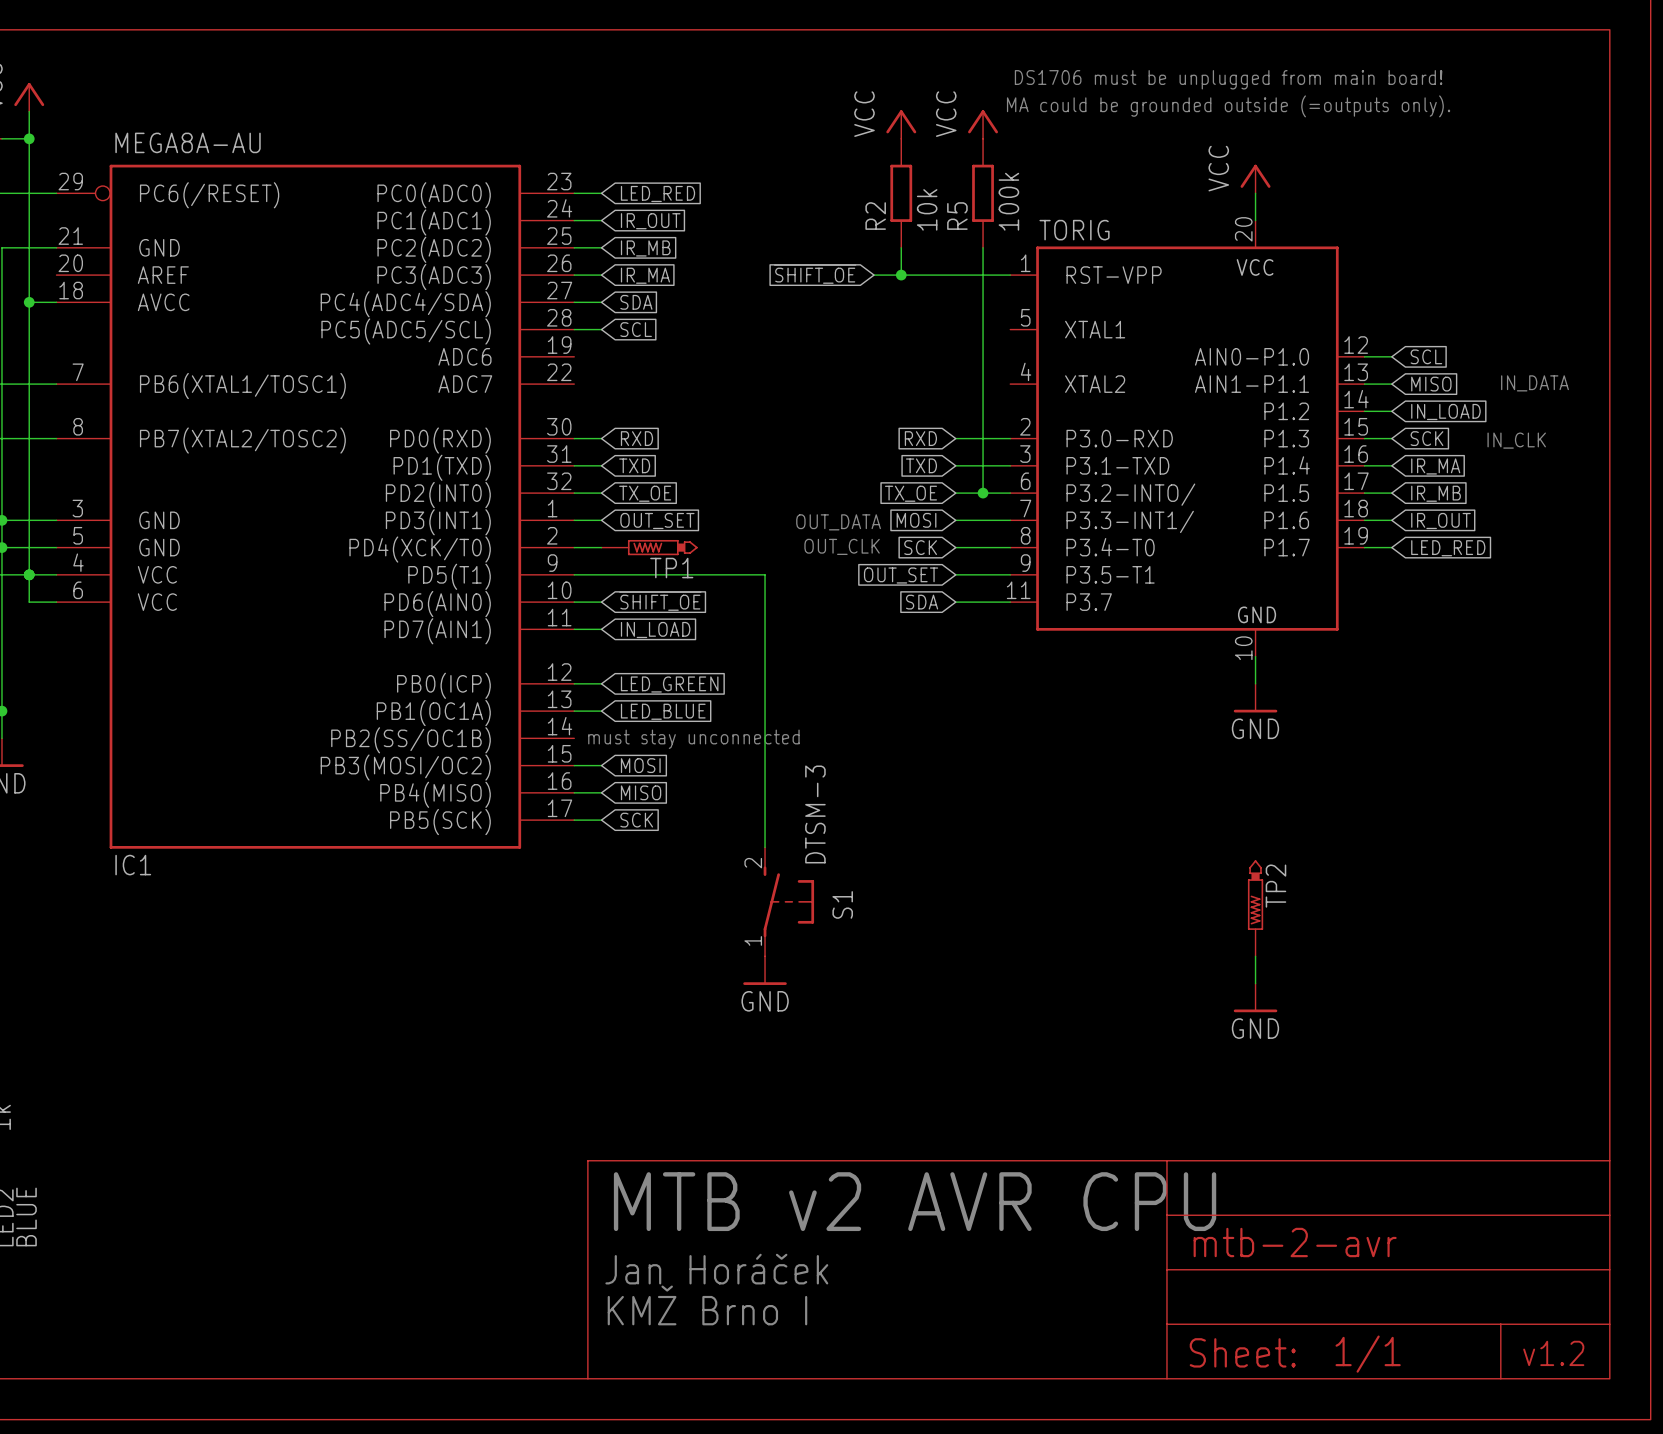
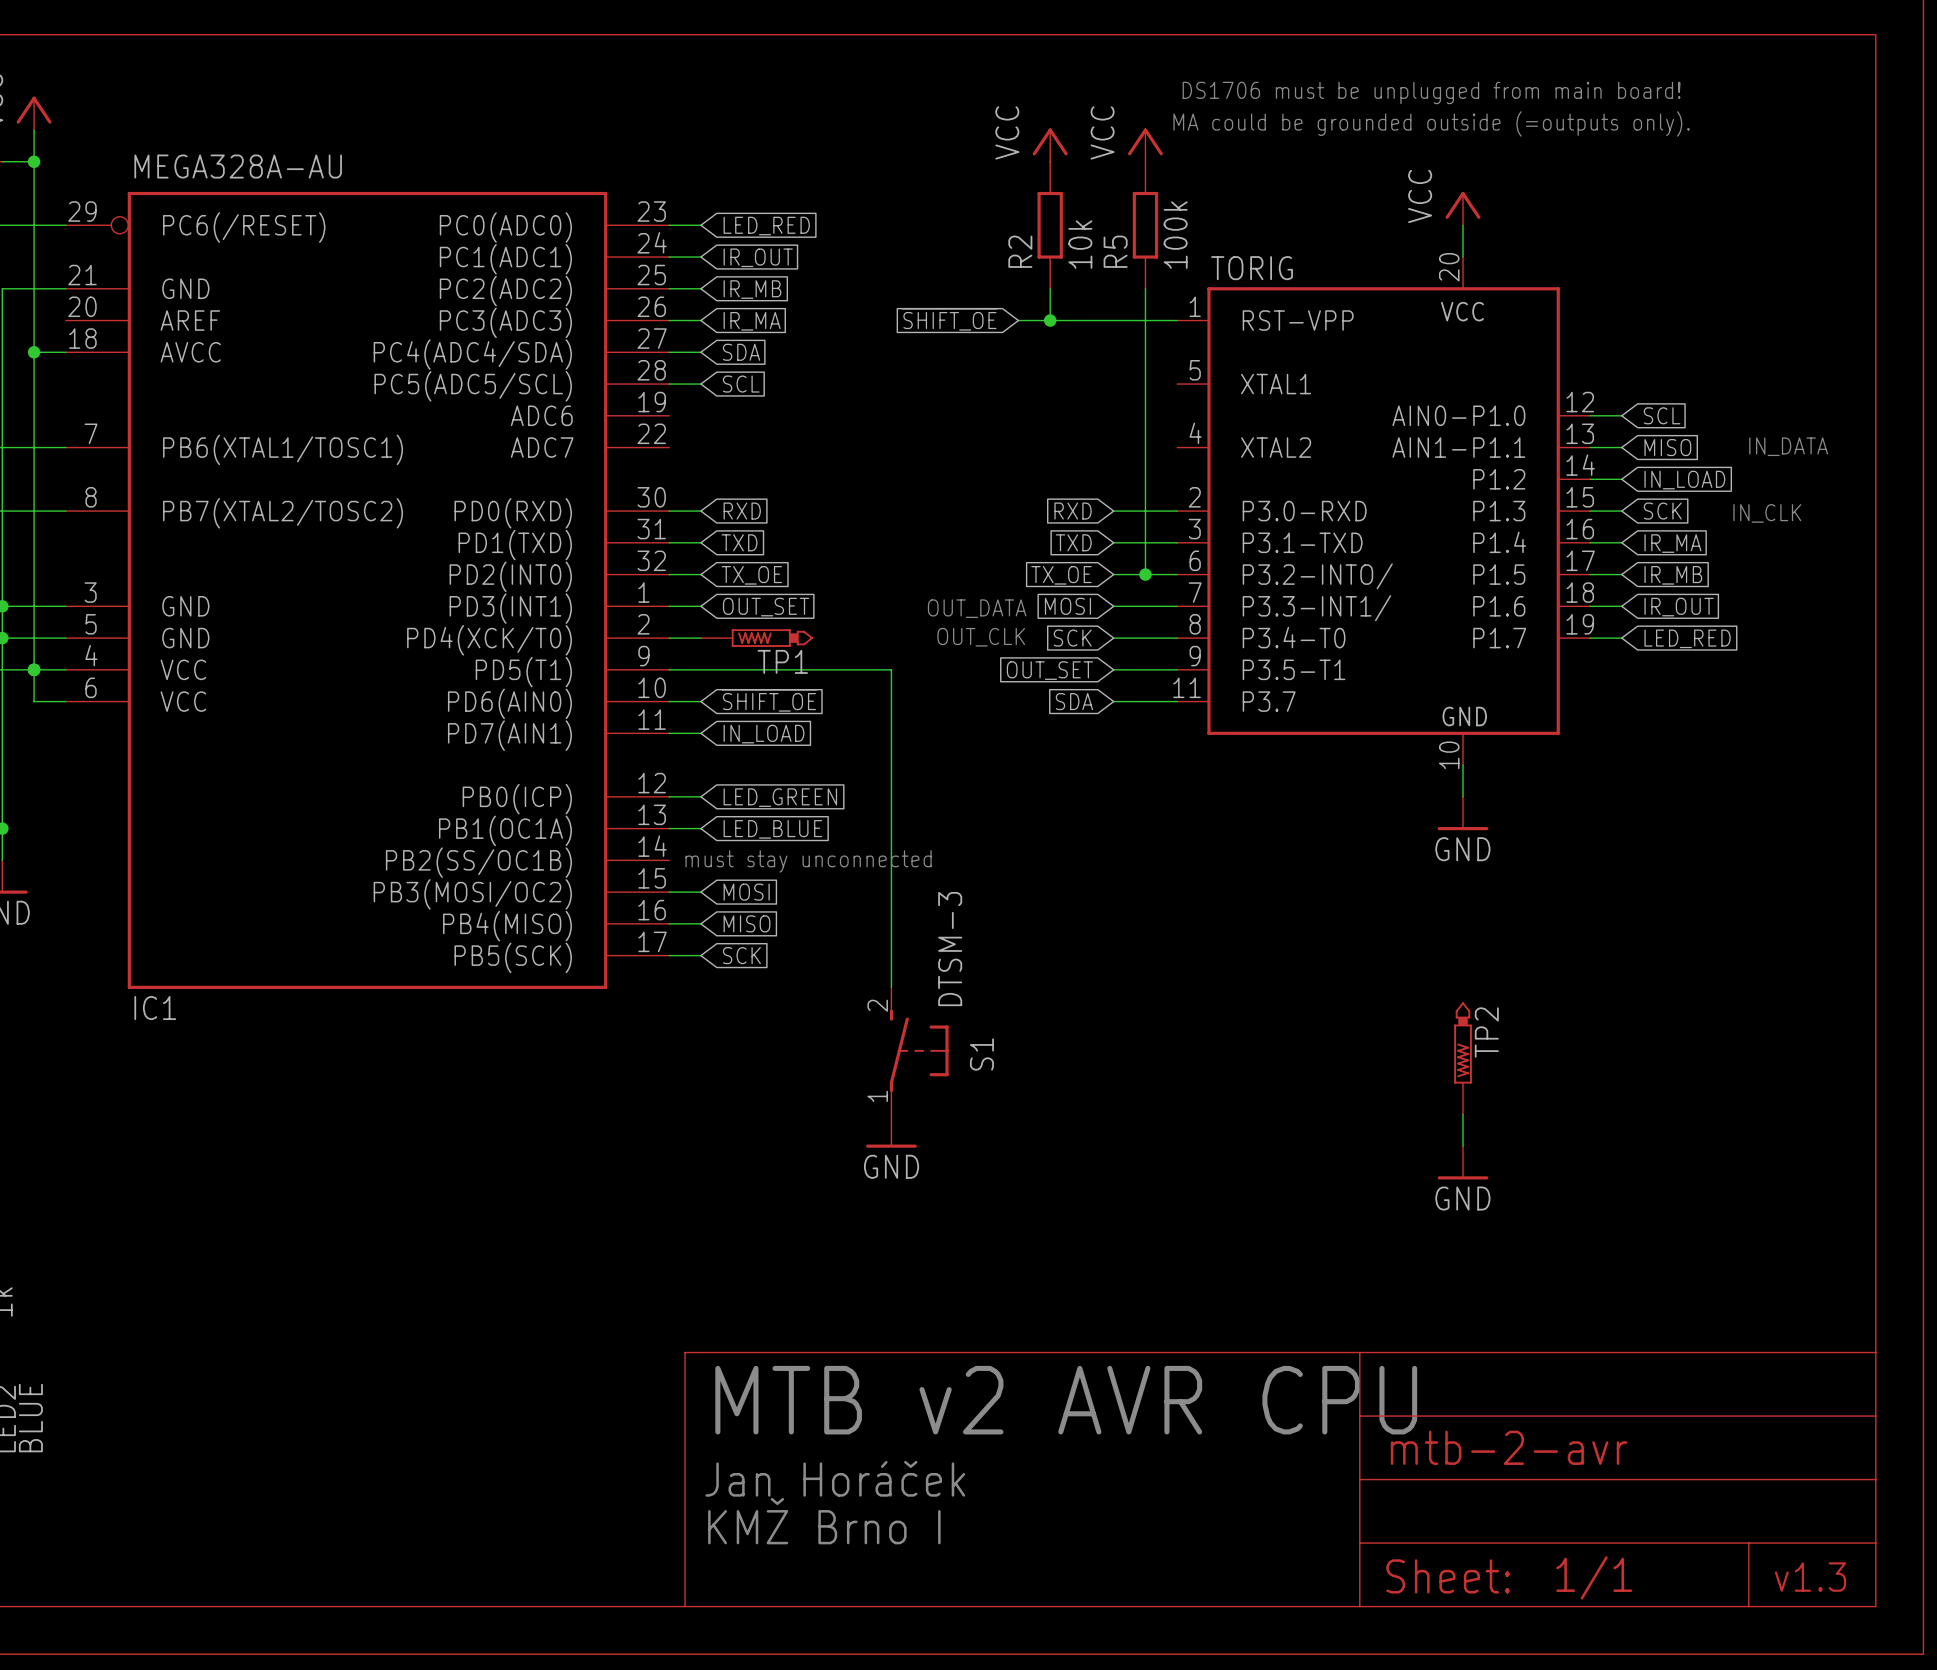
IC1 value: MEGA8A-AU (188, 142) -> MEGA328A-AU (238, 166)
text: v1.2 (1553, 1353) -> v1.3 (1810, 1577)

